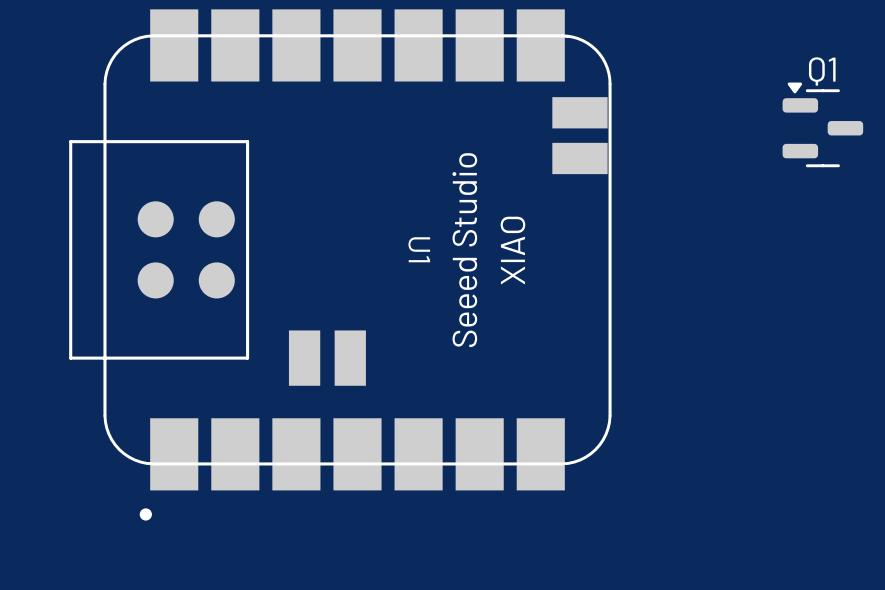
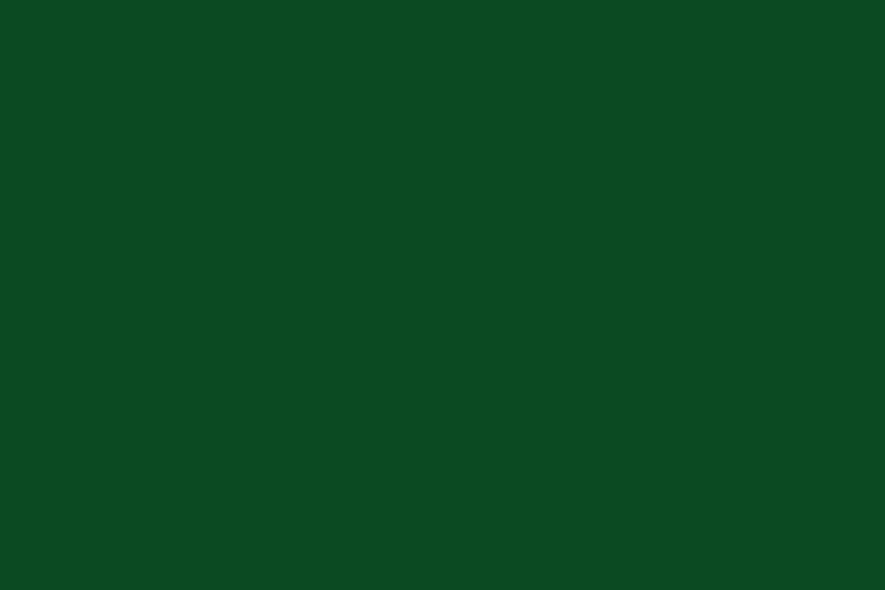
Q1: (822, 124) -> none
U1: (340, 264) -> none

